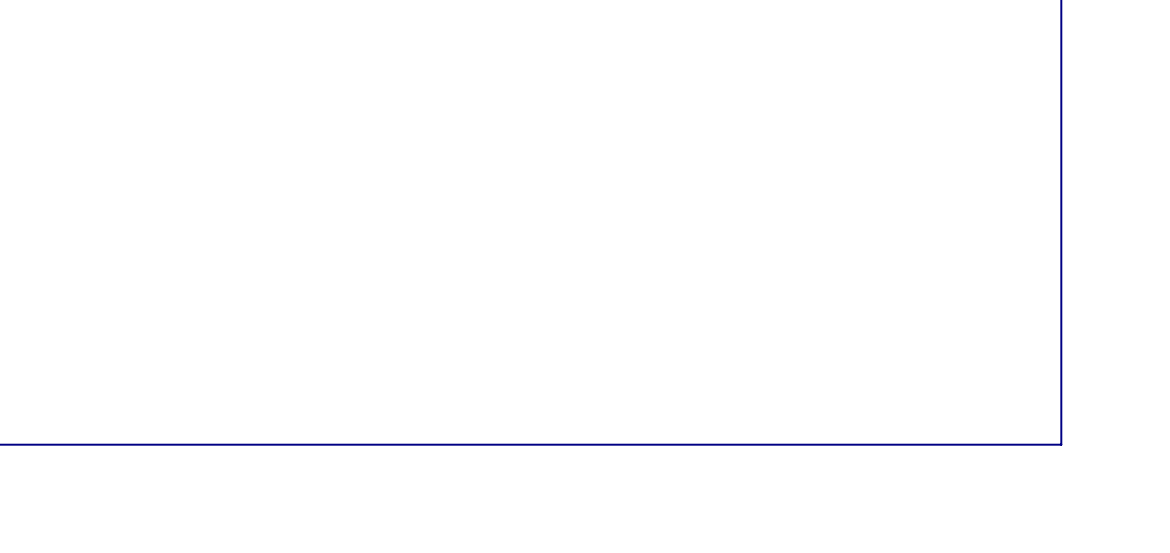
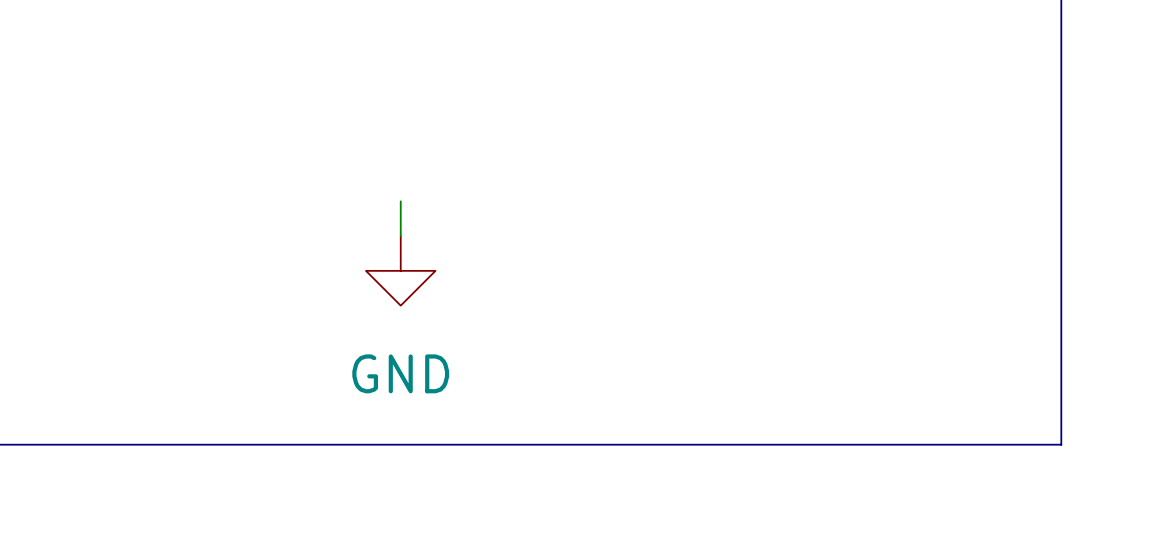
wire: none -> (400, 201) (400, 236)
power symbol: none -> GND (400, 270)

